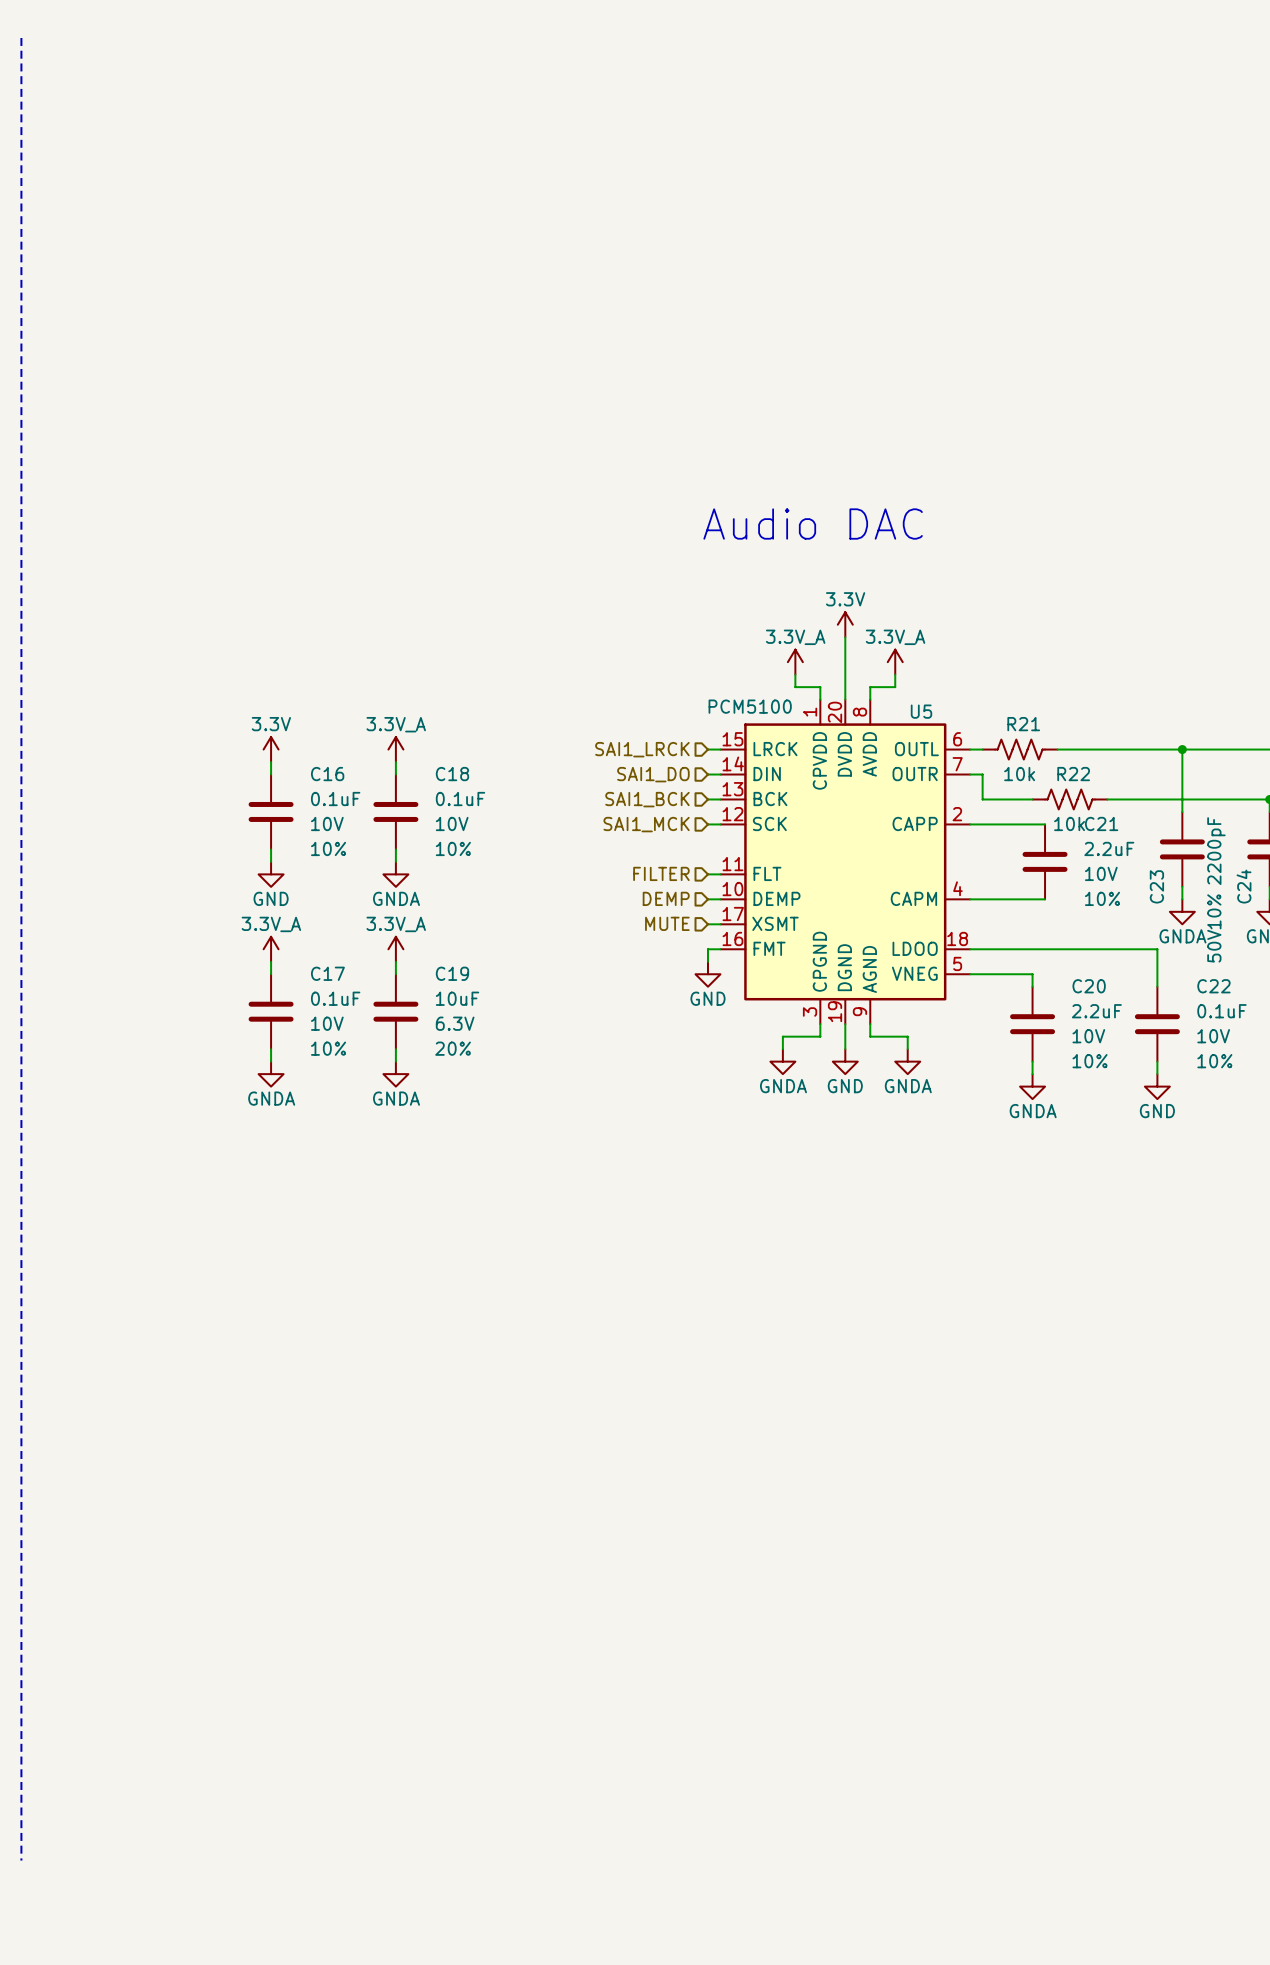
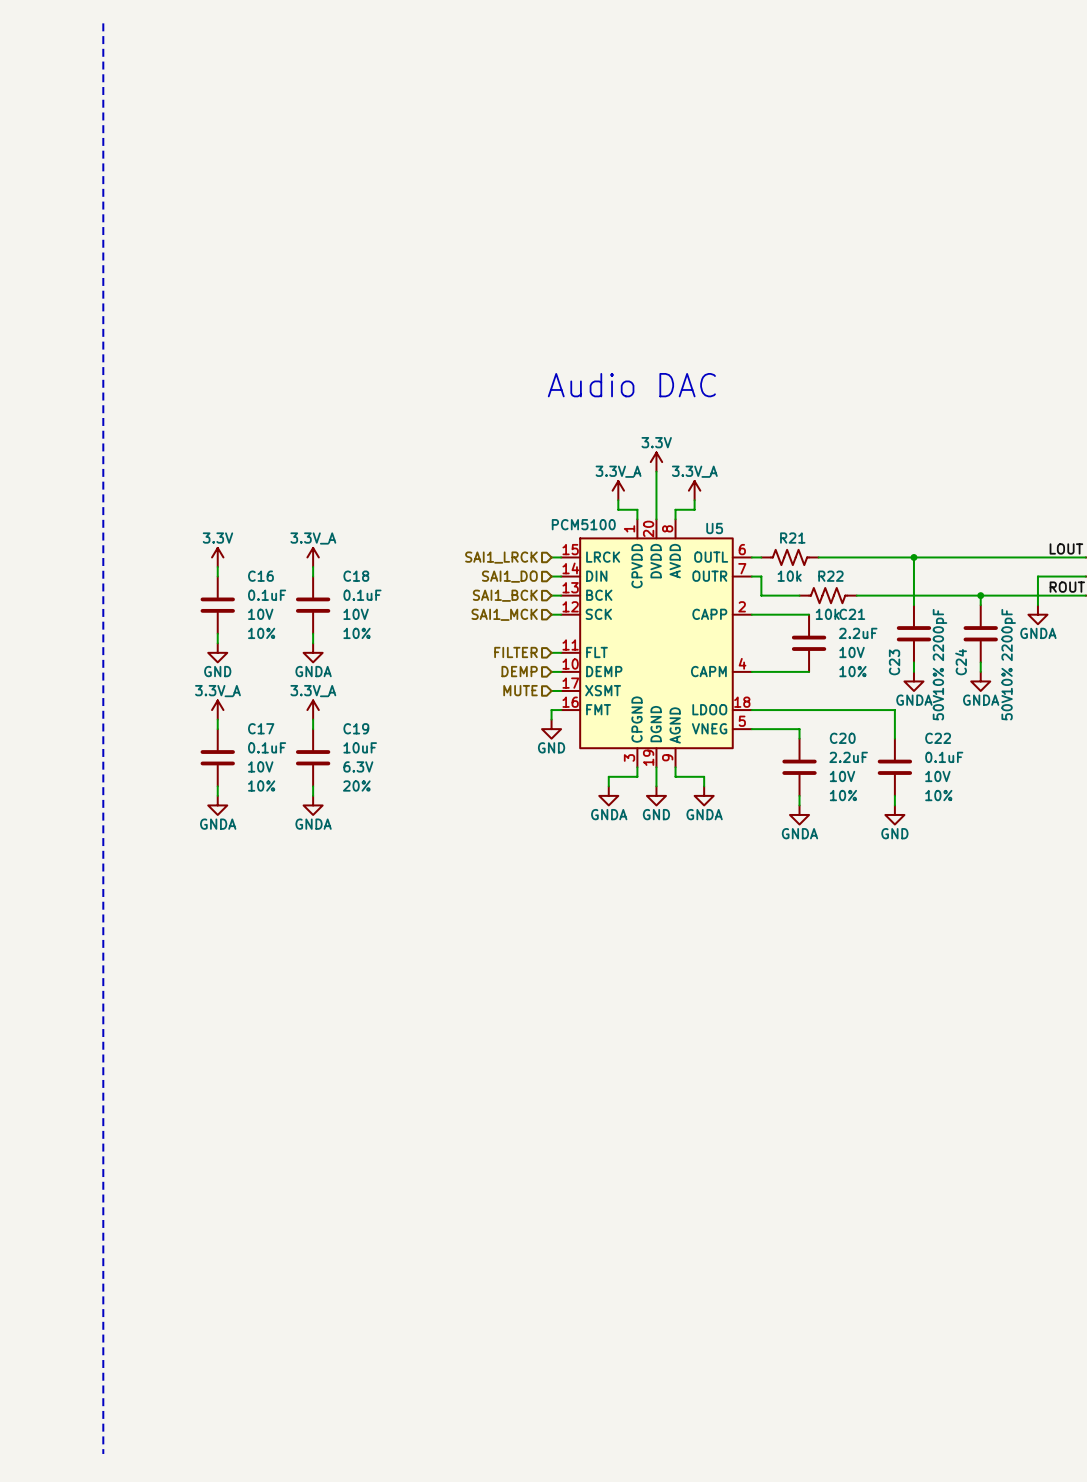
line: (21, 38) (21, 1860) -> none
line: none -> (103, 23) (103, 1453)

